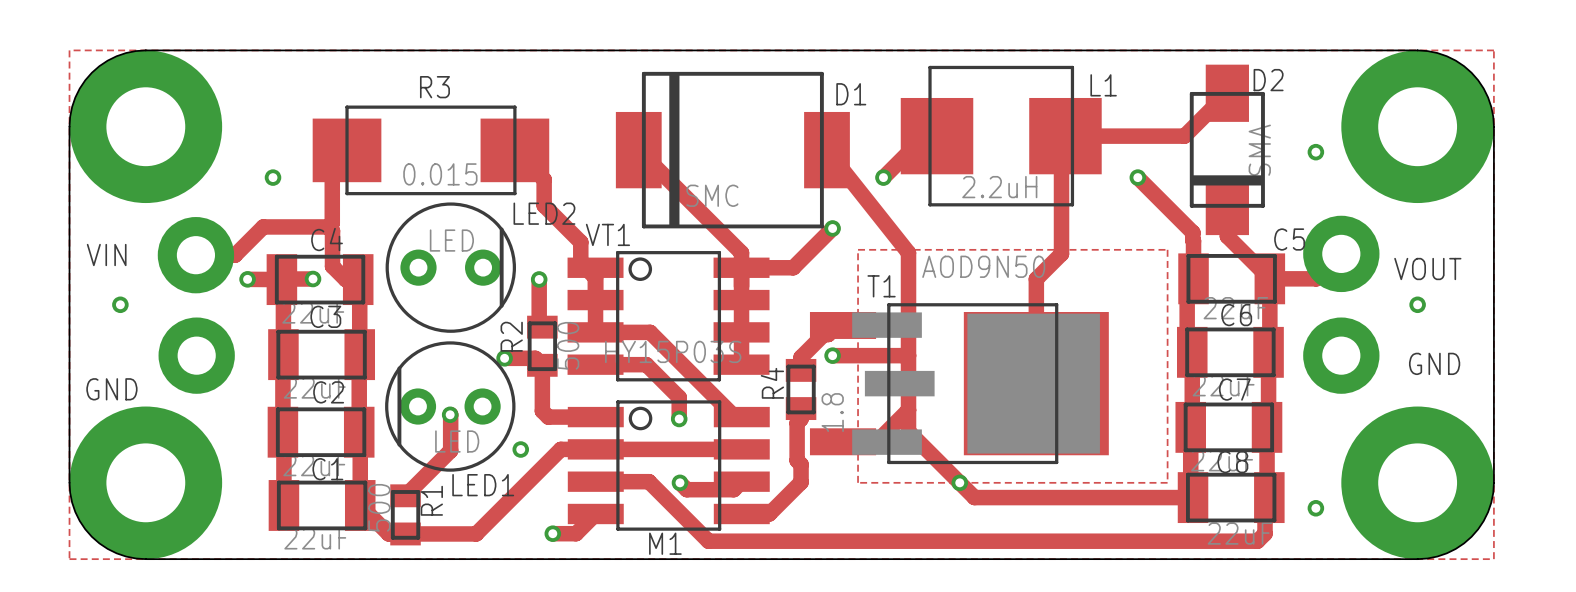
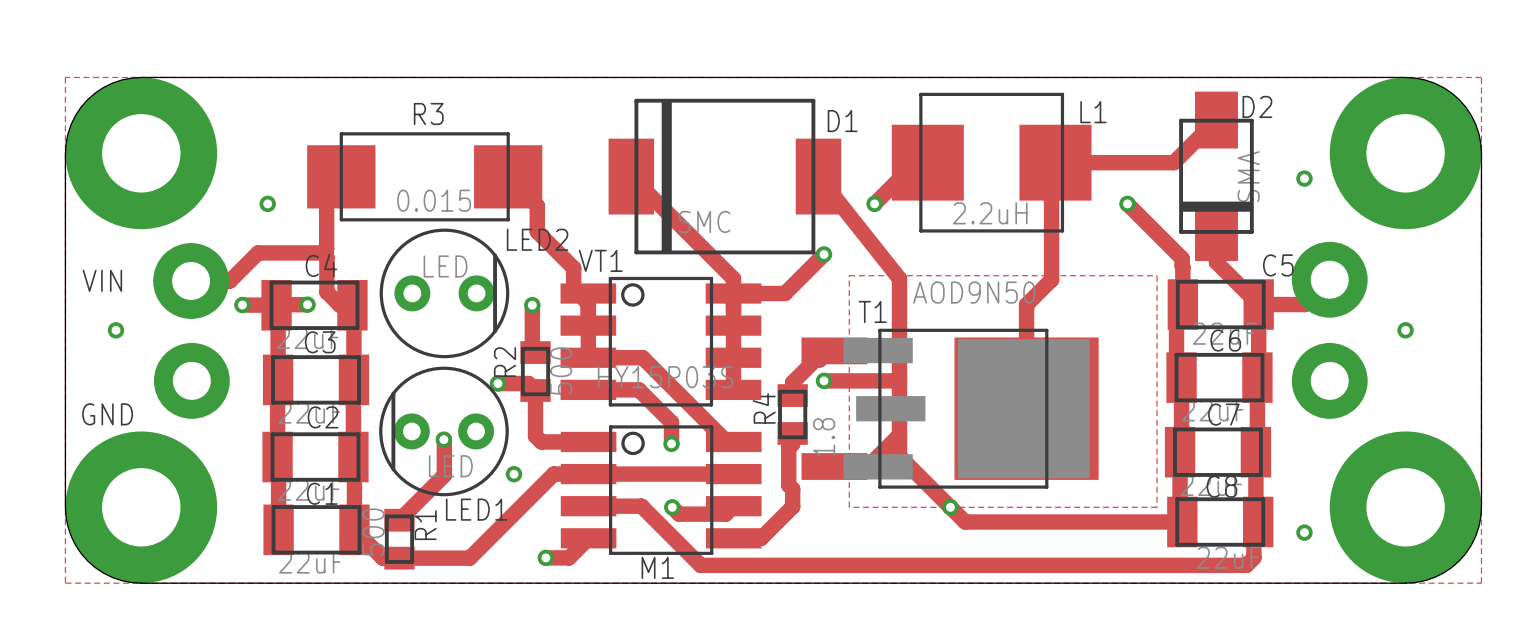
text: VOUT (1427, 269) -> none
text: GND (1434, 363) -> none

